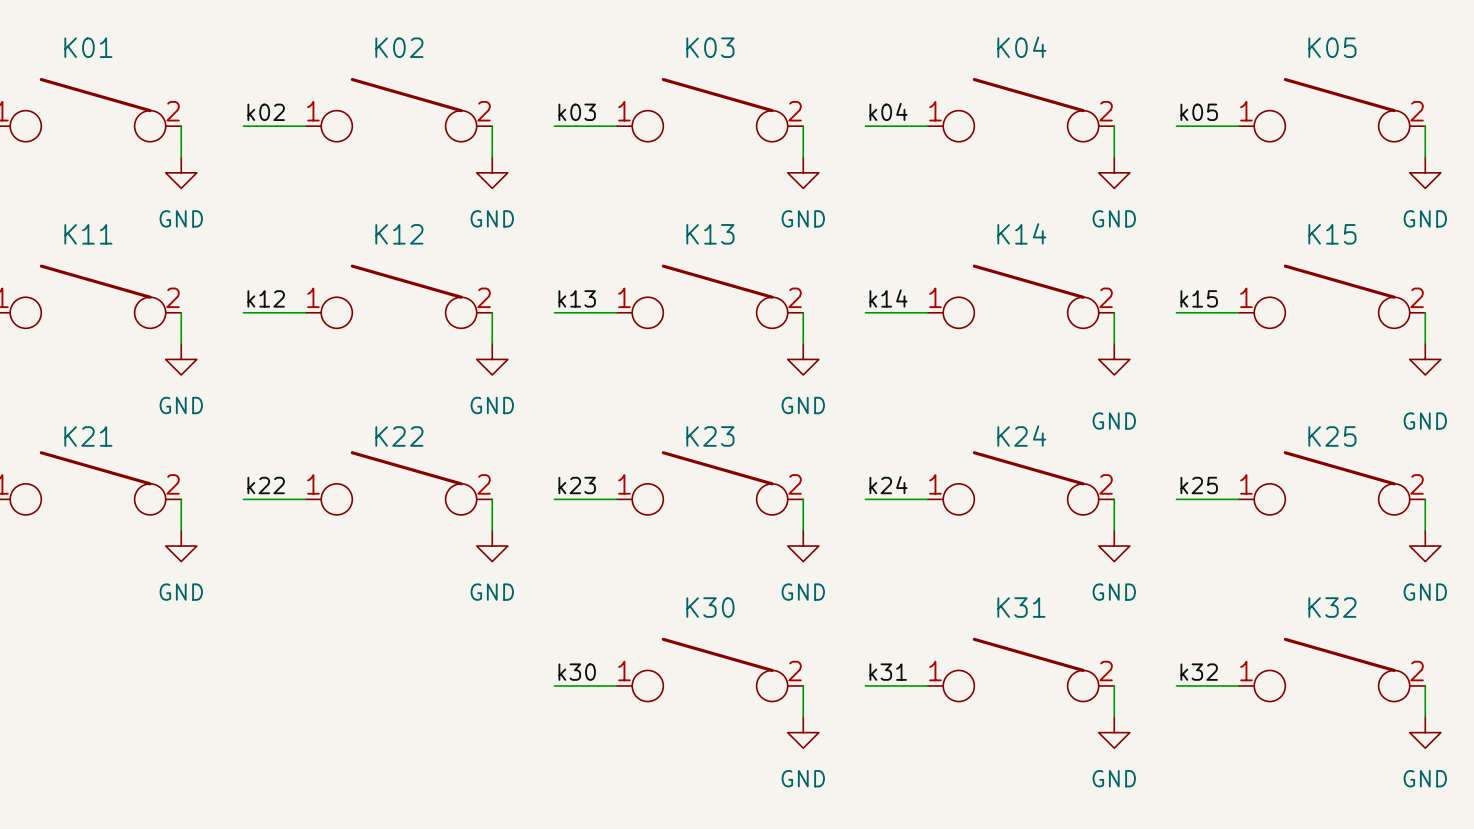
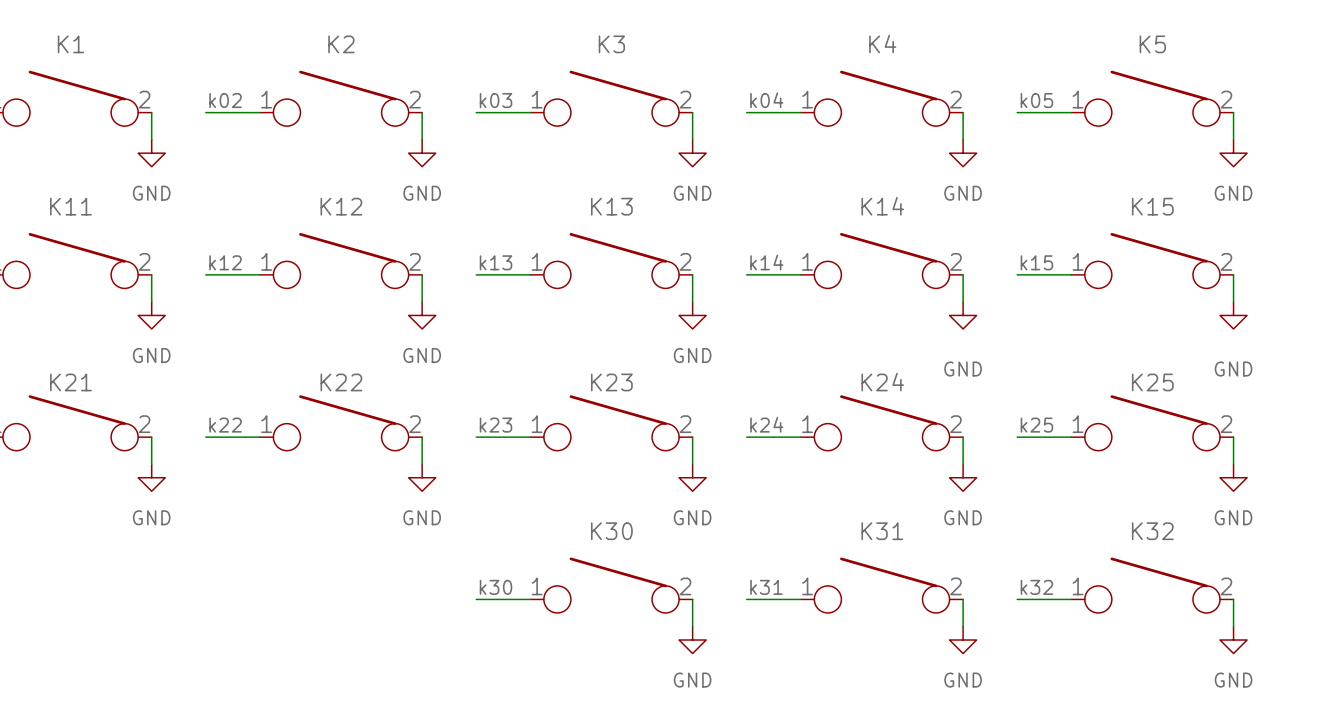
K01 name: K01 (88, 47) -> K1 (70, 44)
K02 name: K02 (399, 47) -> K2 (341, 44)
K03 name: K03 (710, 47) -> K3 (611, 44)
K04 name: K04 (1021, 47) -> K4 (882, 44)
K05 name: K05 (1332, 47) -> K5 (1152, 44)

